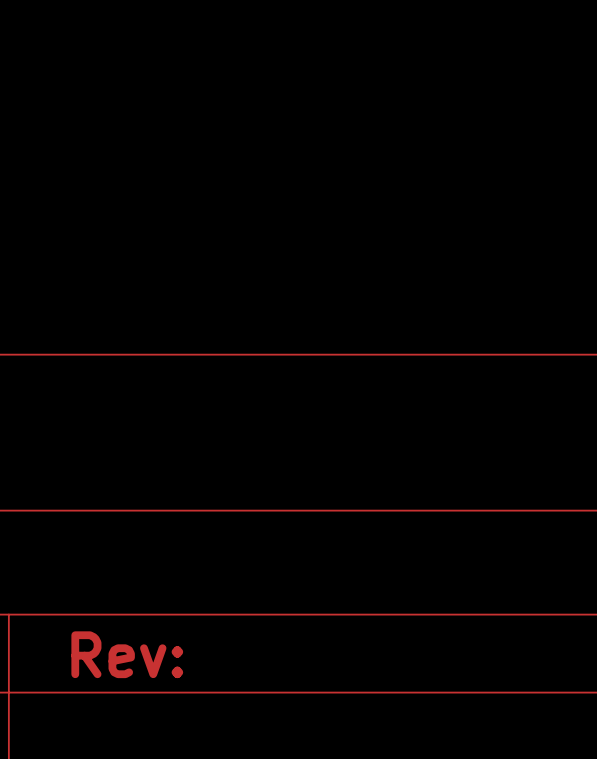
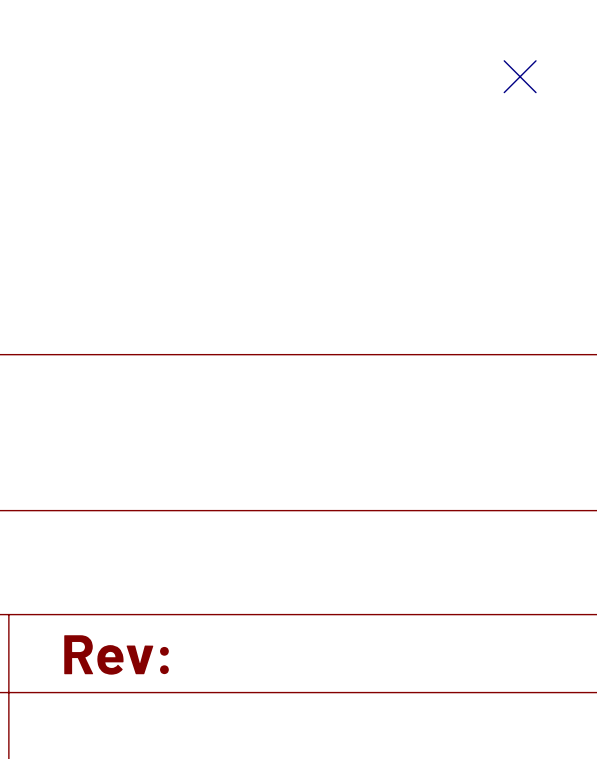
no-connect mark: none -> (520, 76)

